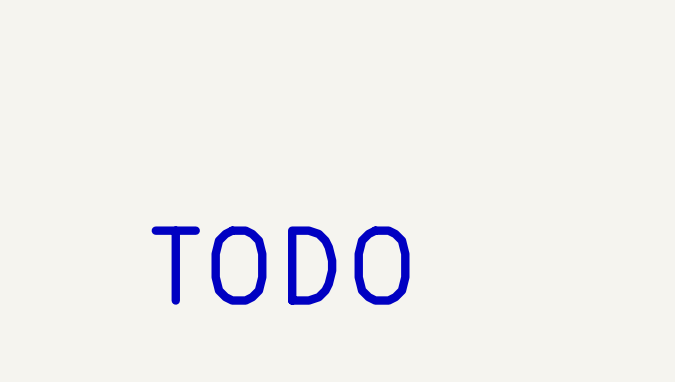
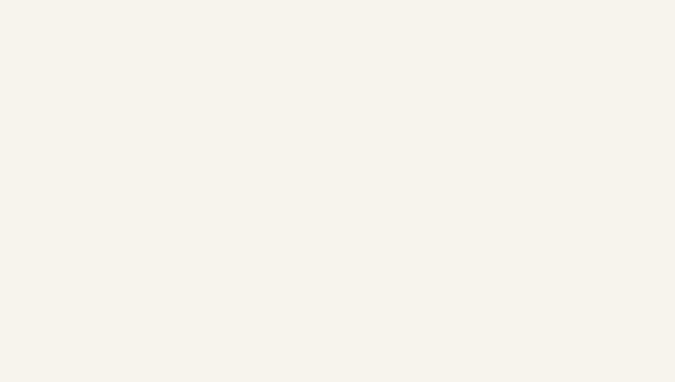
text: TODO (280, 265) -> none

